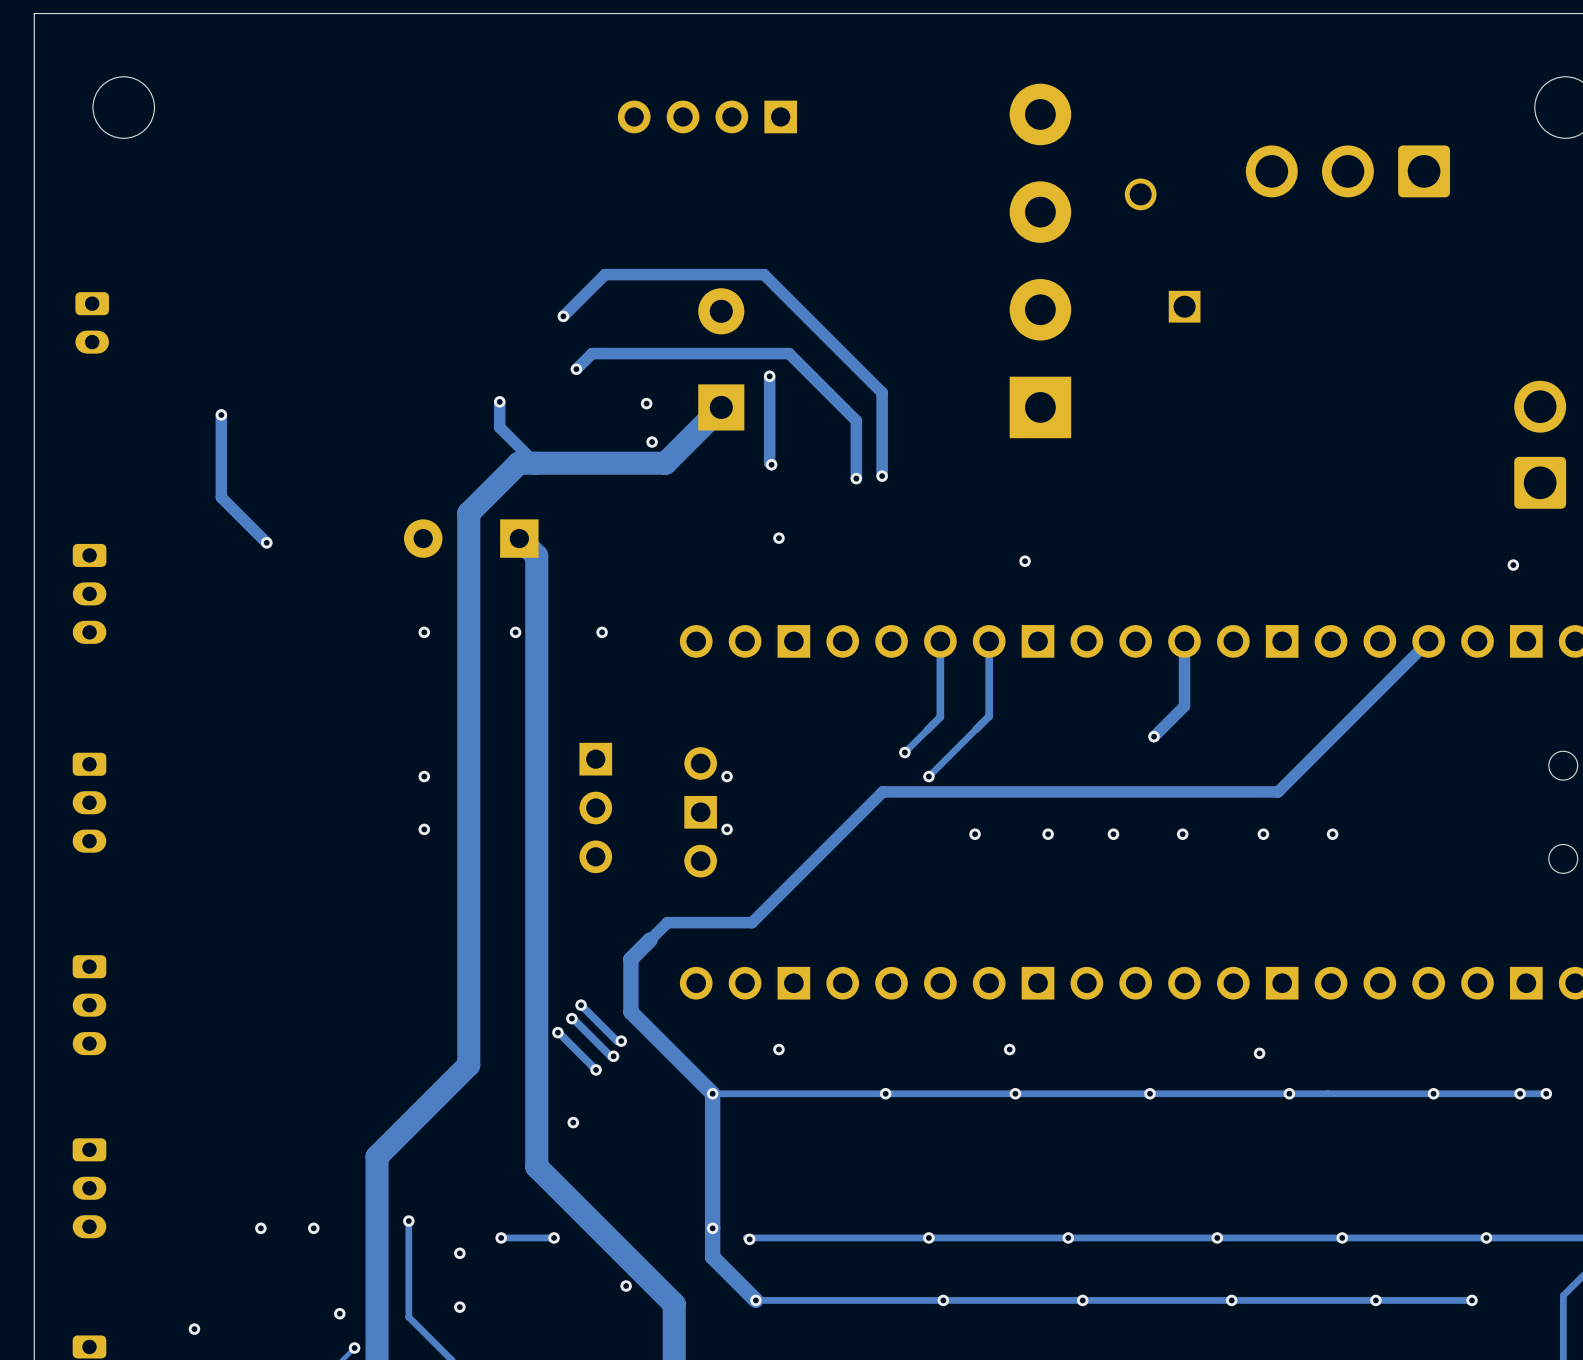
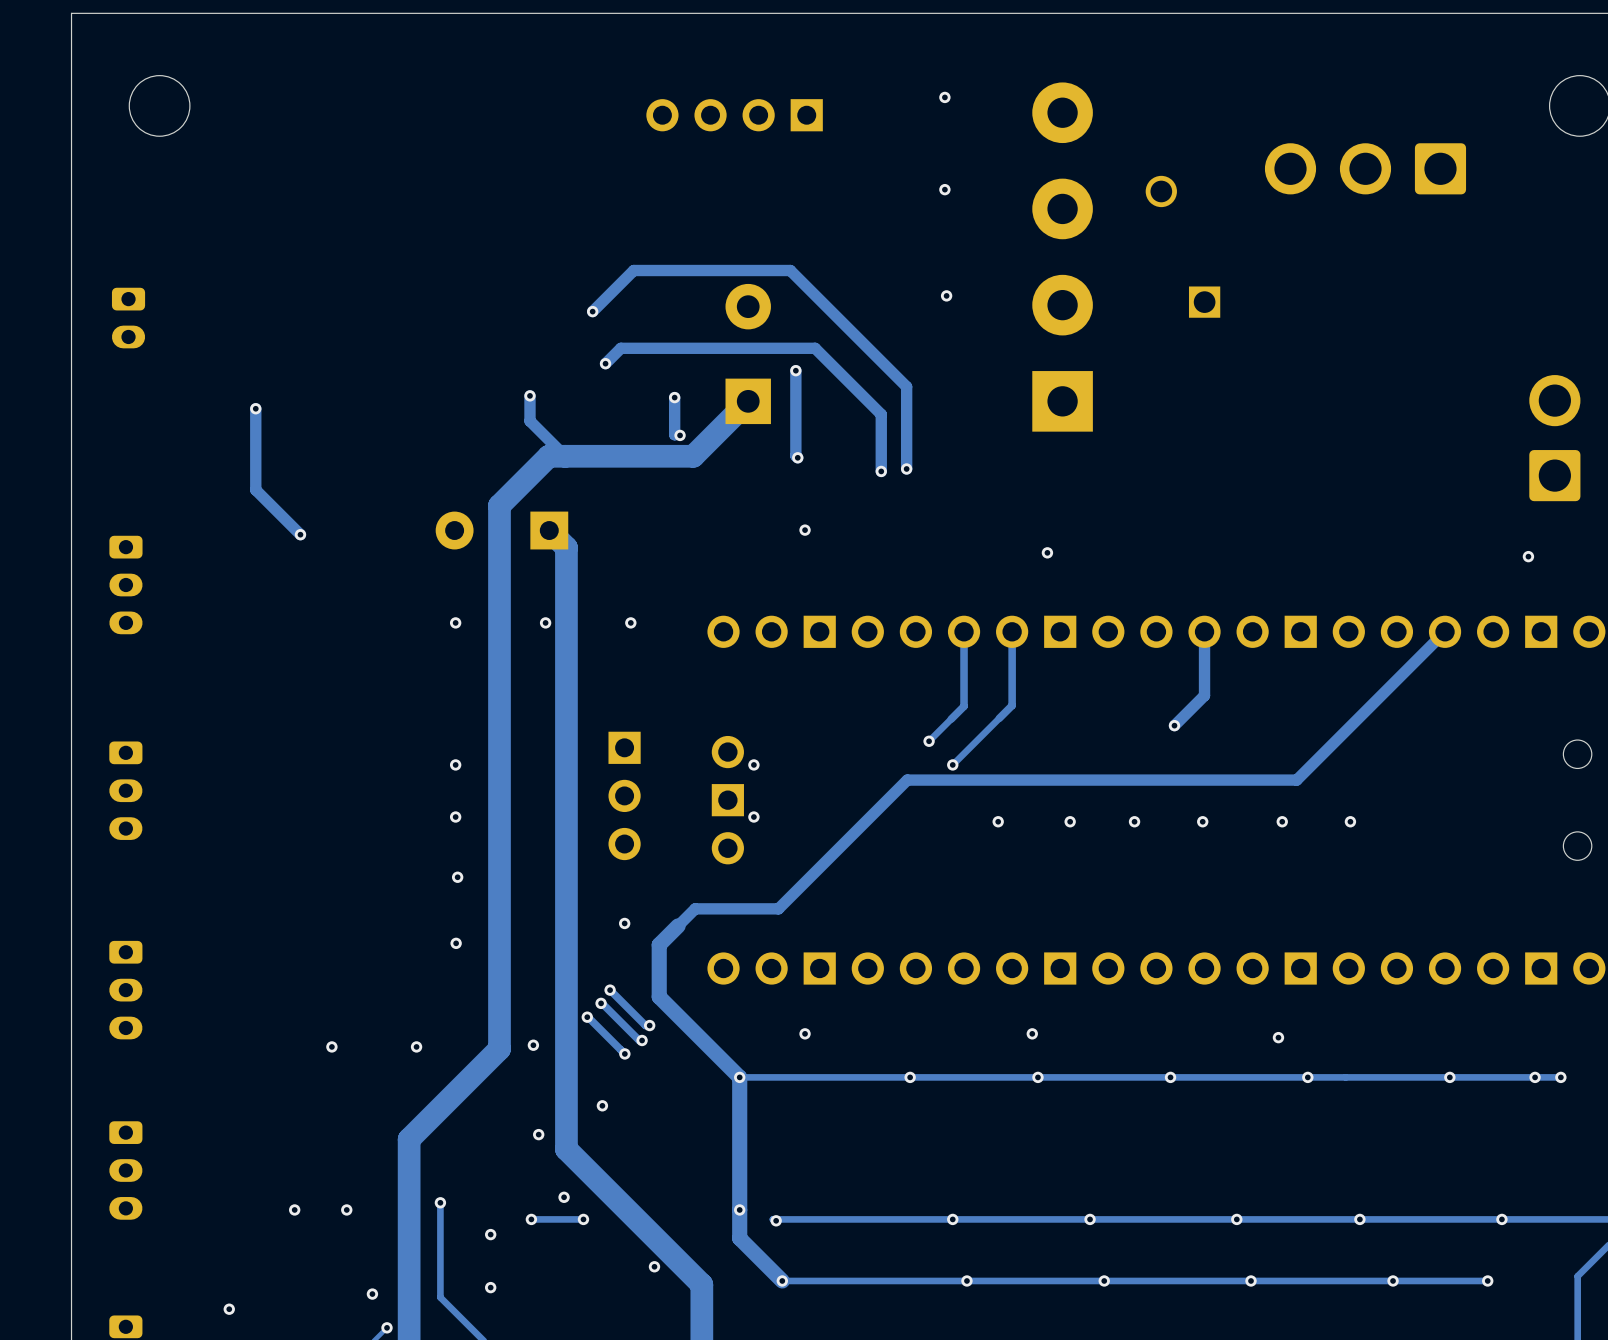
via: none -> (944, 97)
via: none -> (944, 189)
via: none -> (946, 295)
track: none -> (674, 397) (674, 434)
via: none -> (457, 877)
via: none -> (624, 923)
via: none -> (456, 943)
via: none -> (533, 1045)
via: none -> (331, 1046)
via: none -> (416, 1046)
via: none -> (538, 1134)
via: none -> (564, 1197)

